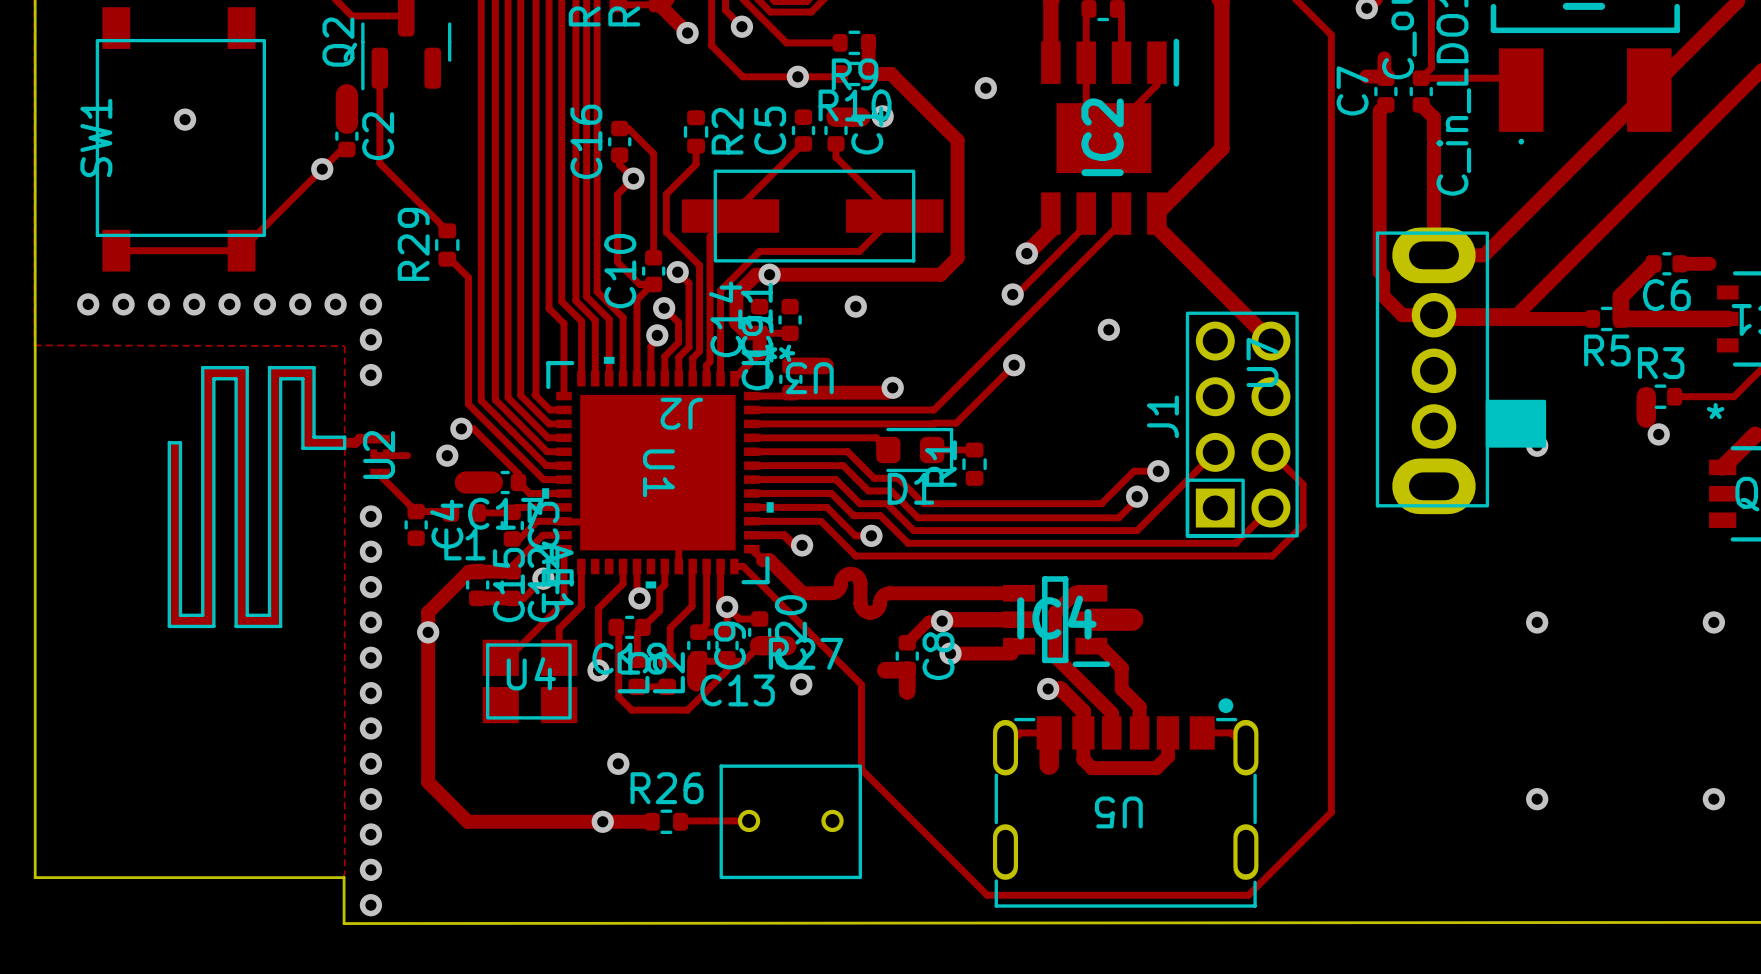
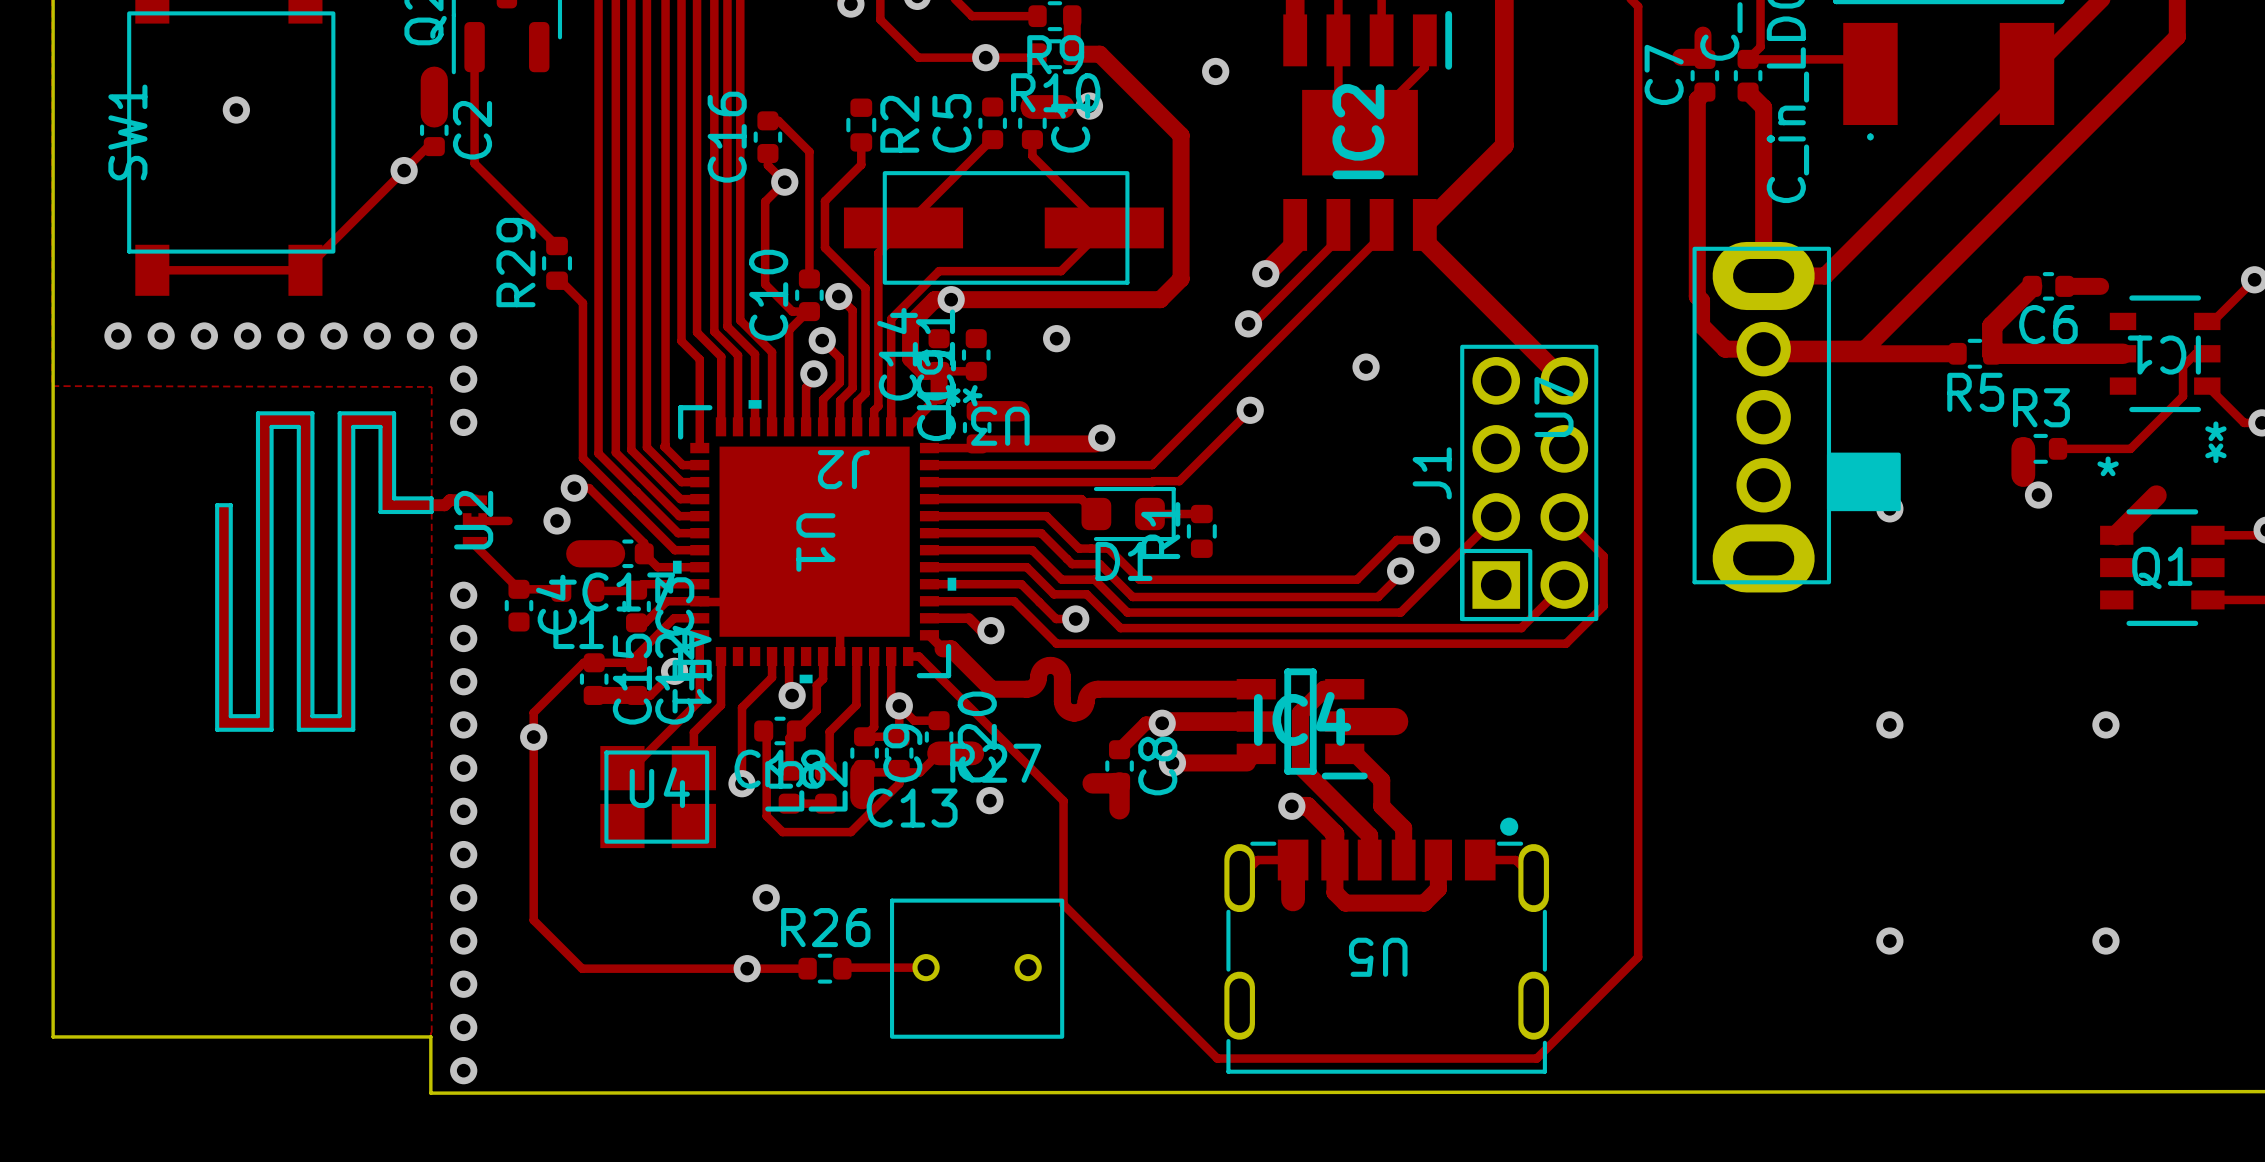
track width: thick (512, 571) (469, 571) (428, 612) (428, 782) (467, 821) (652, 821) -> thin (636, 662) (583, 662) (533, 712) (533, 920) (582, 968) (807, 968)

